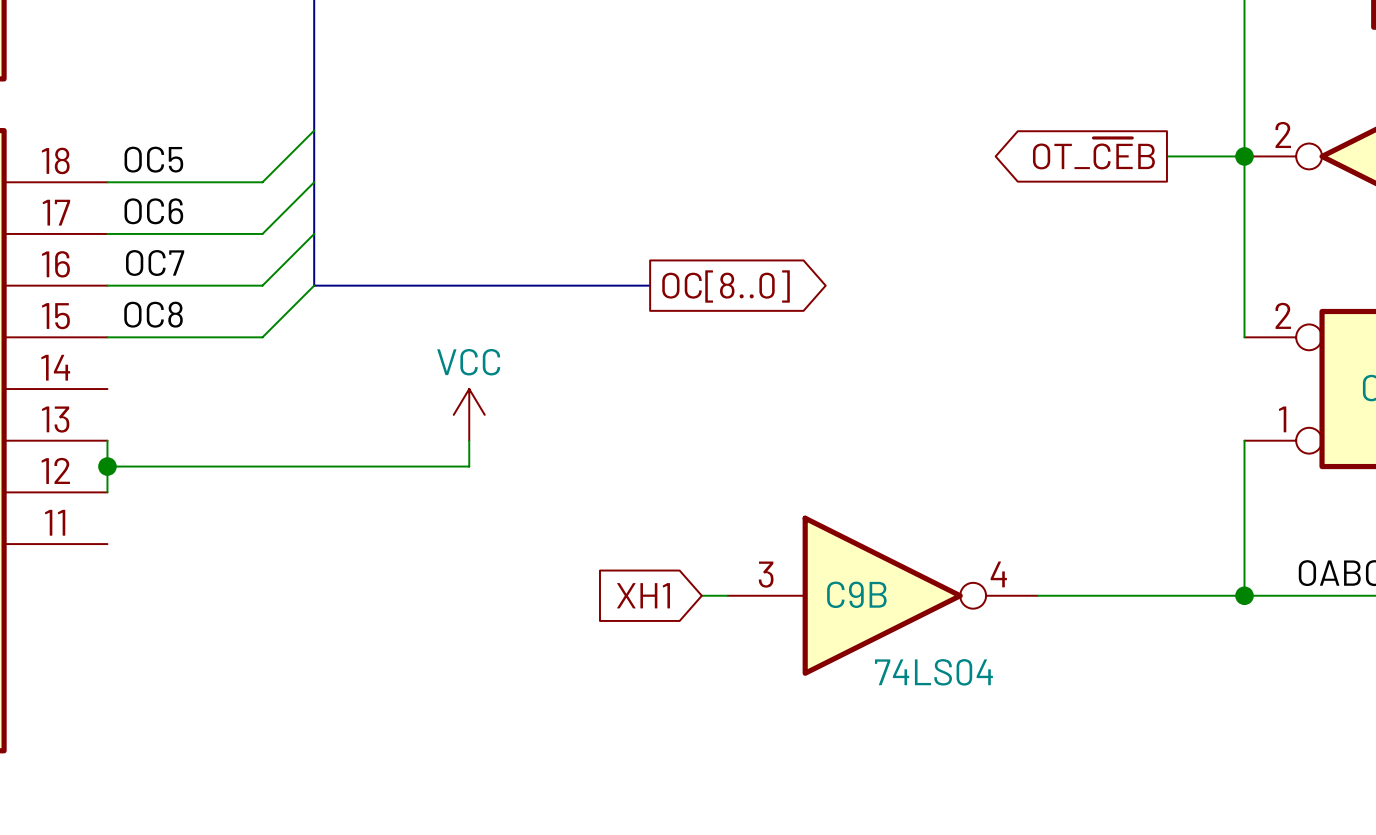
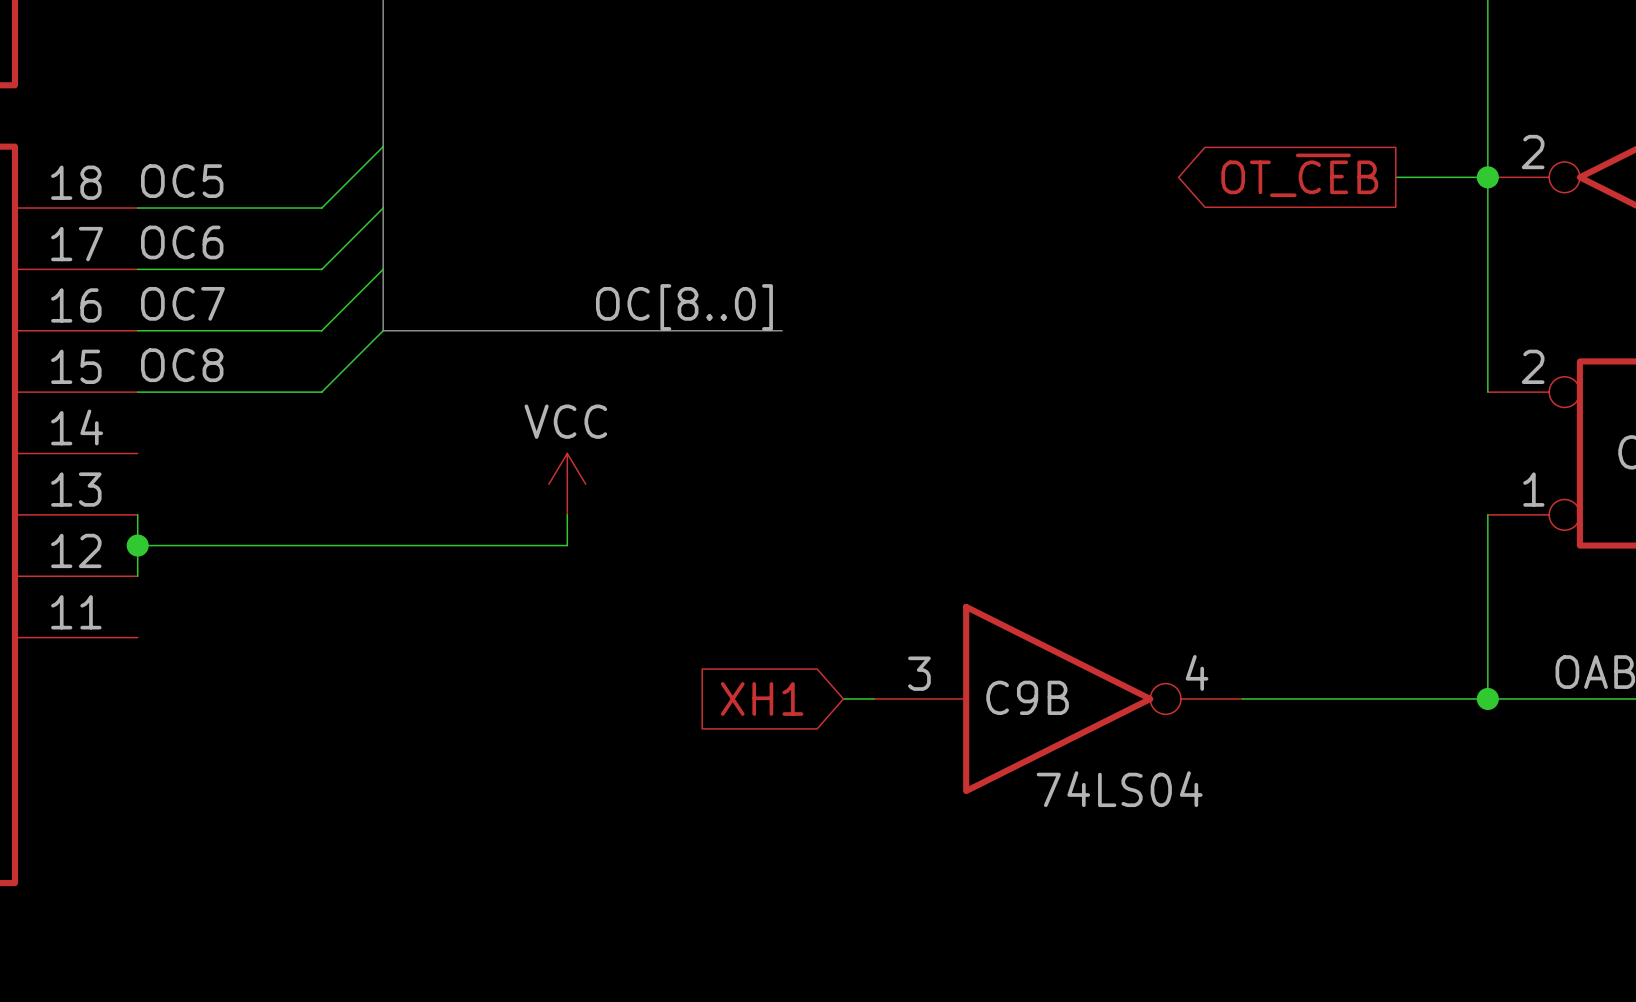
label: none -> OC[8..0] (684, 307)
global label: OC[8..0] (726, 286) -> none

